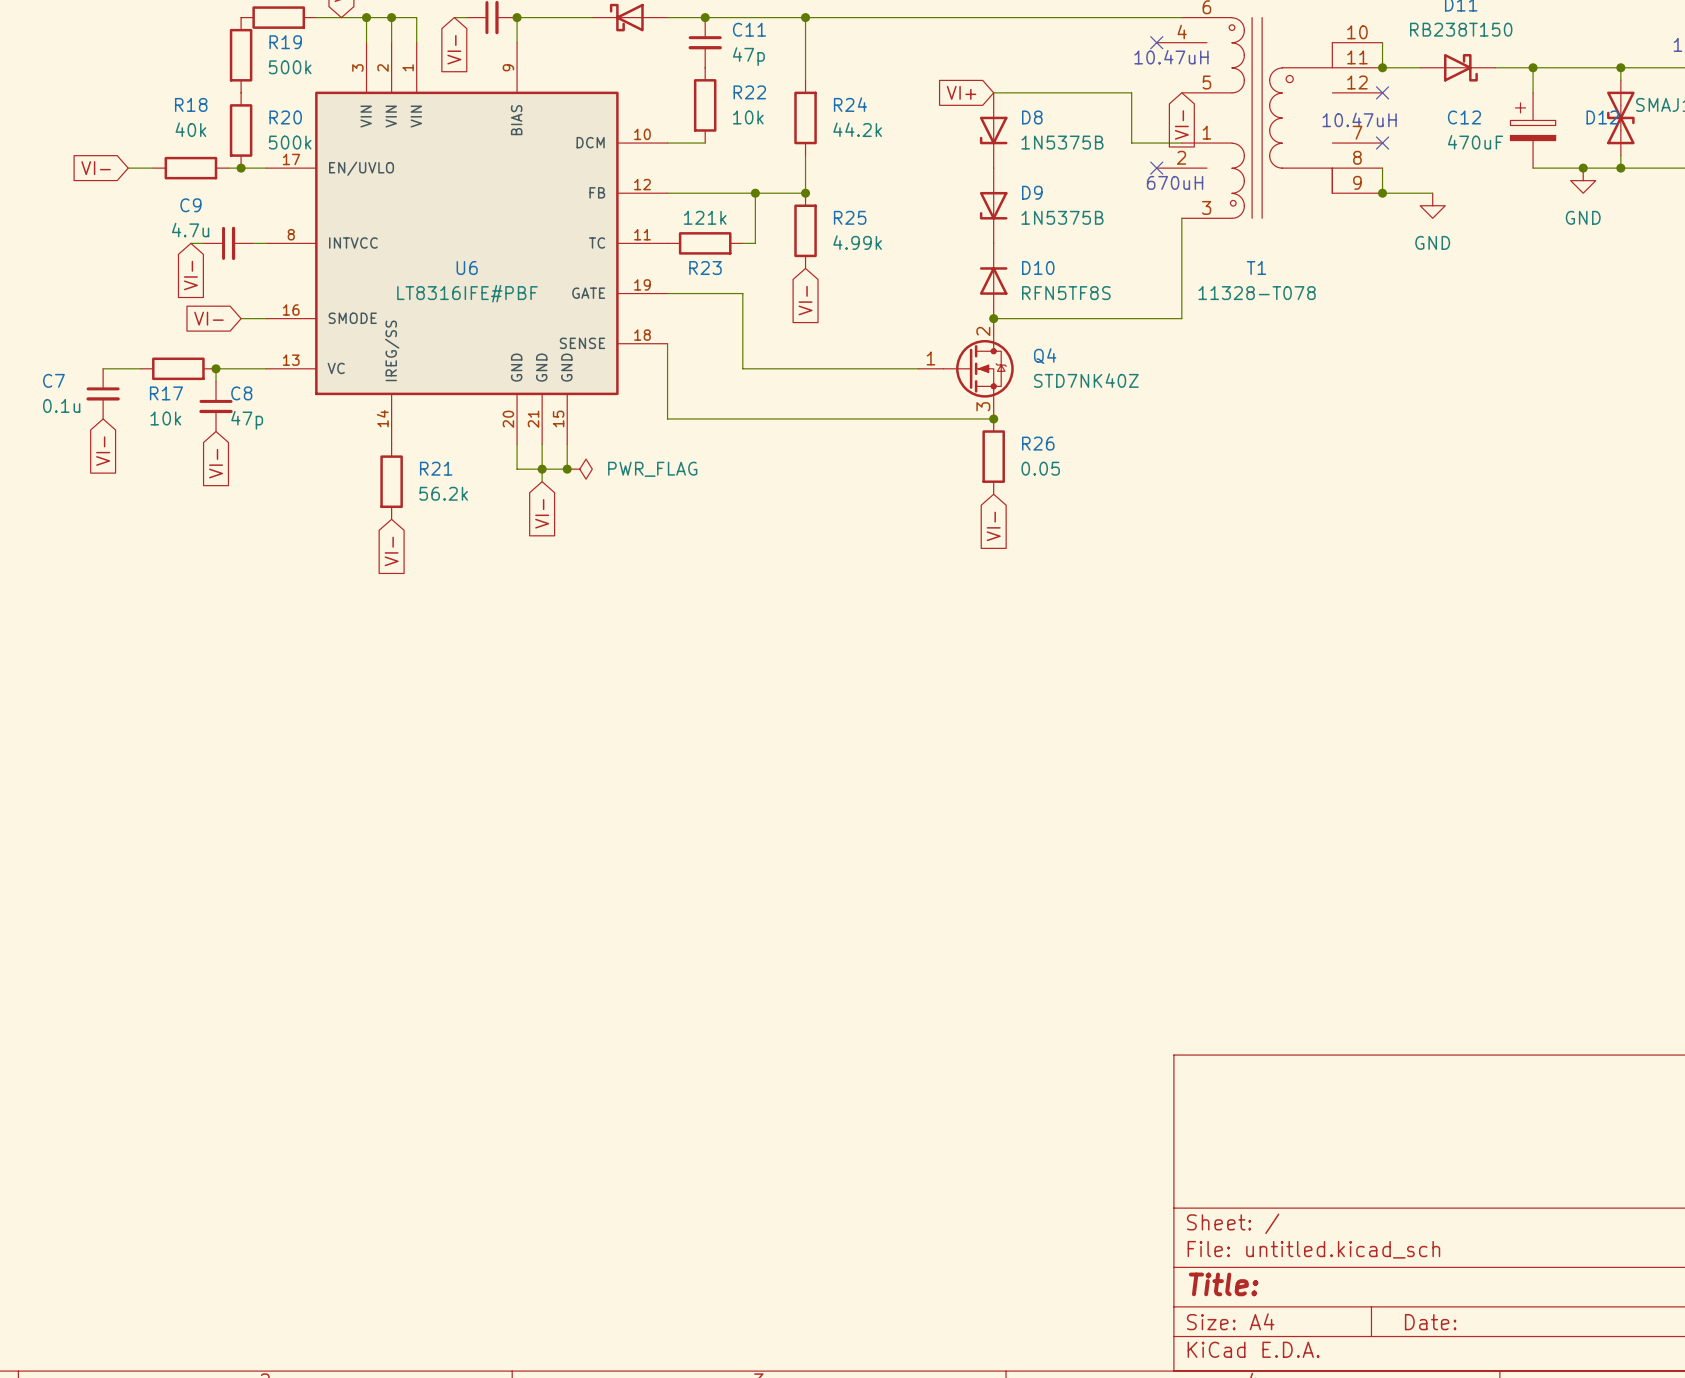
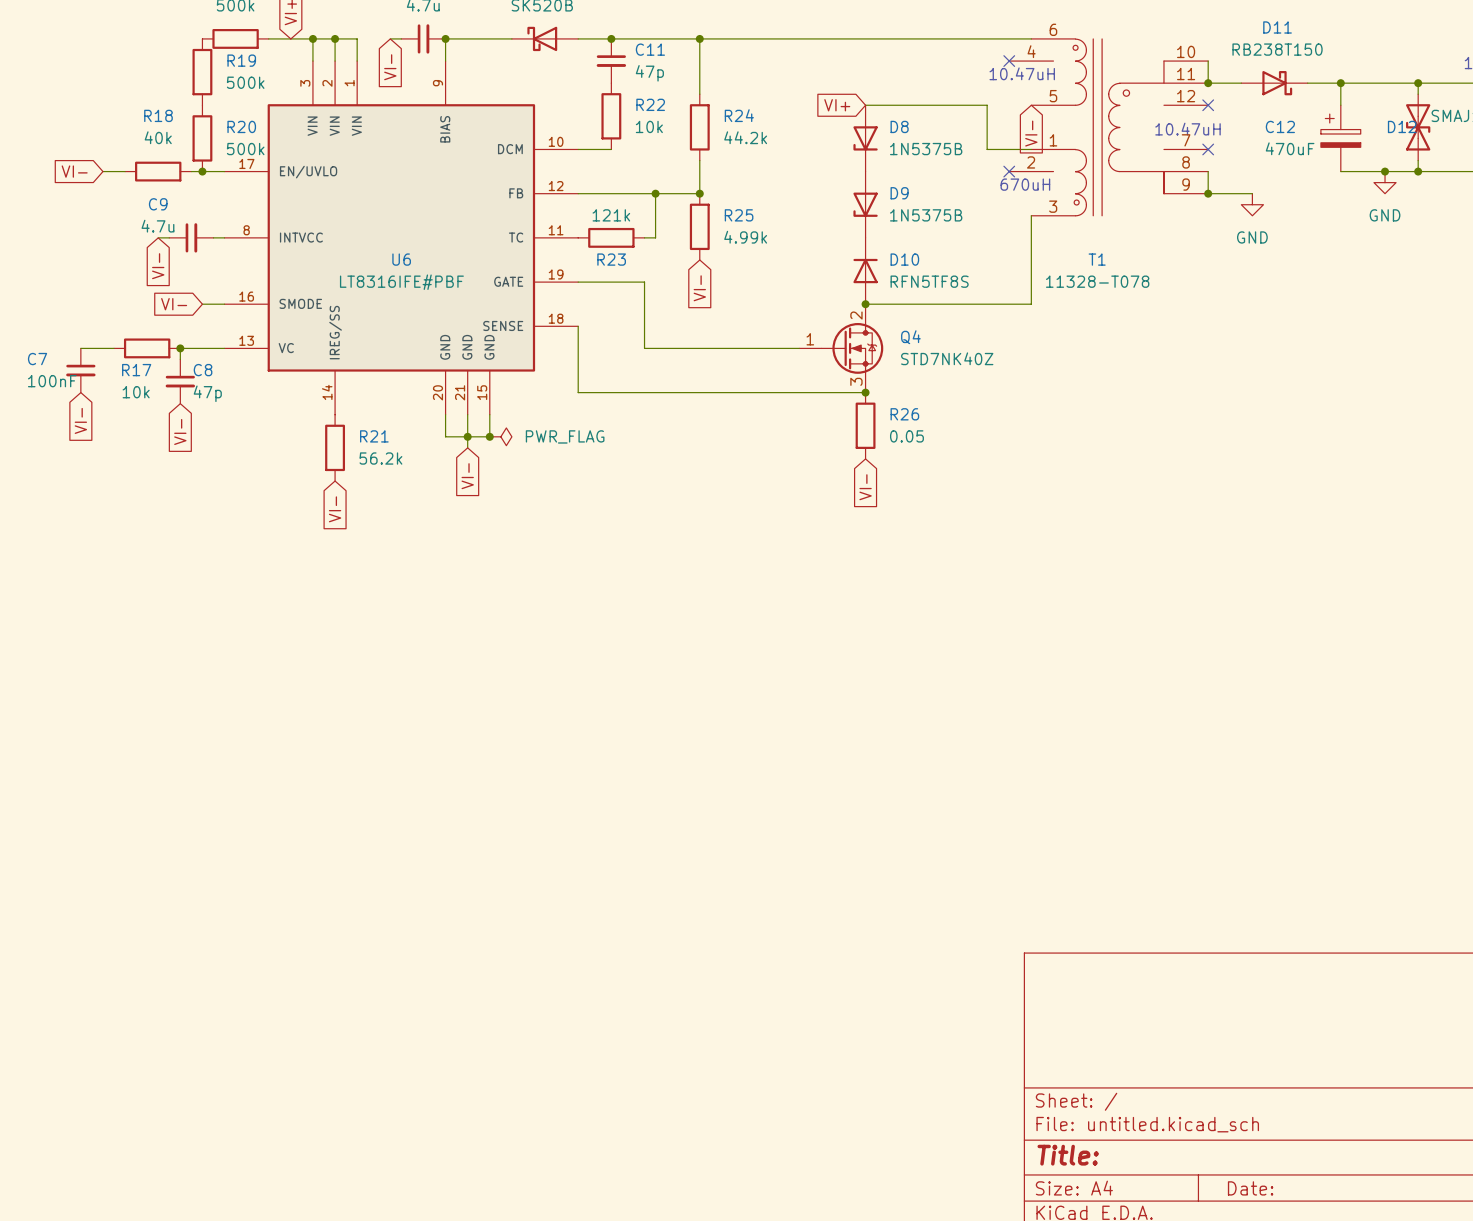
C7 value: 0.1u (61, 405) -> 100nF (52, 381)

